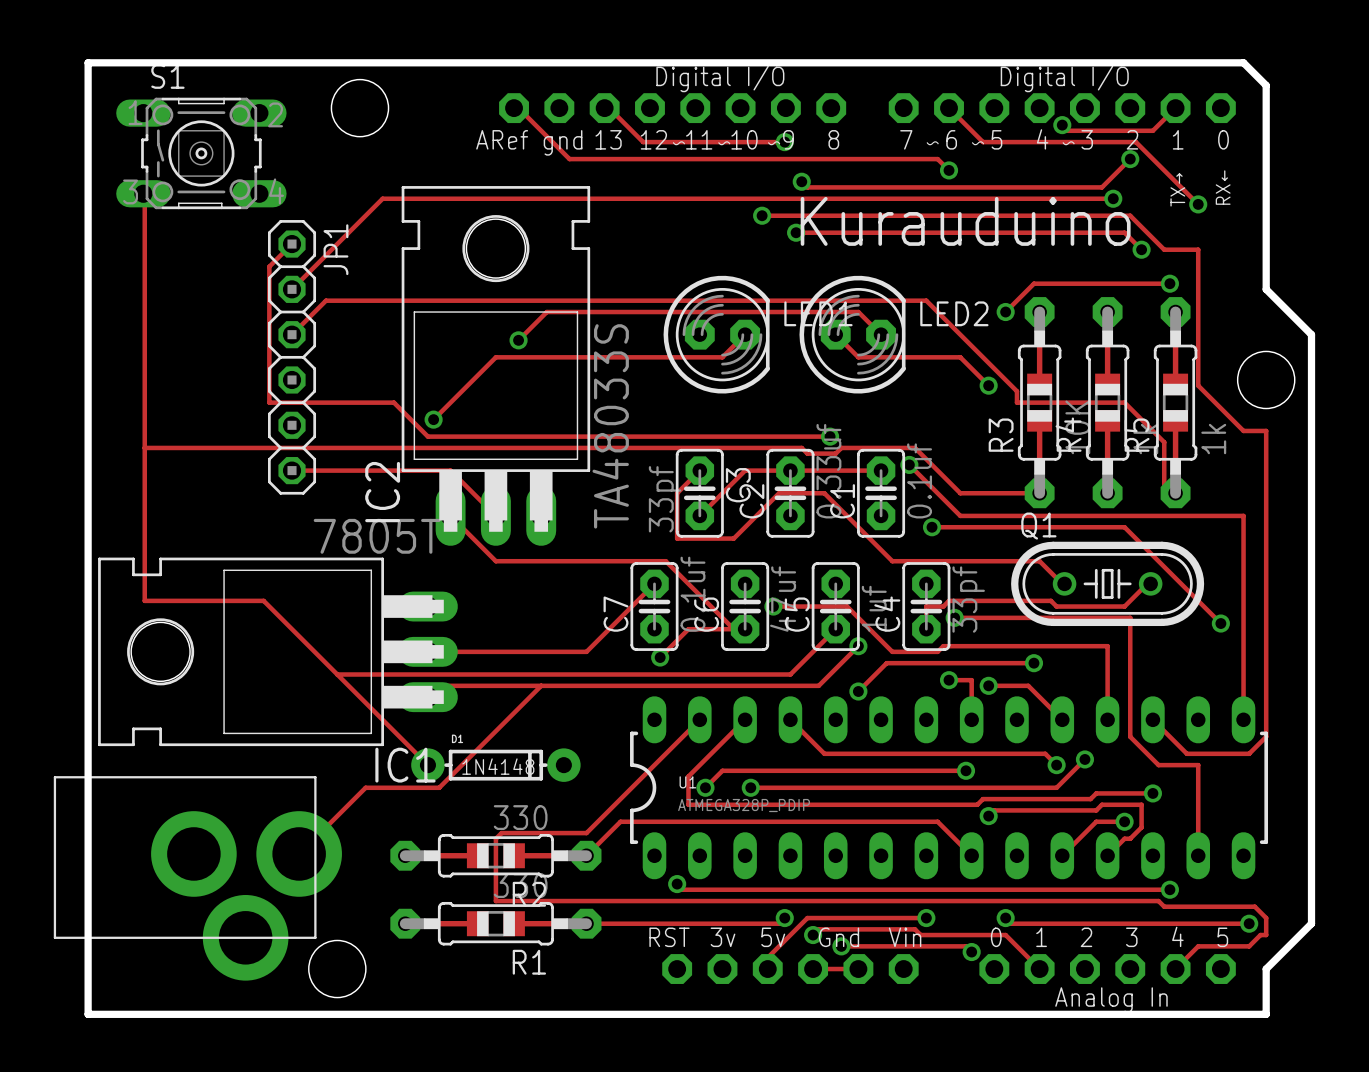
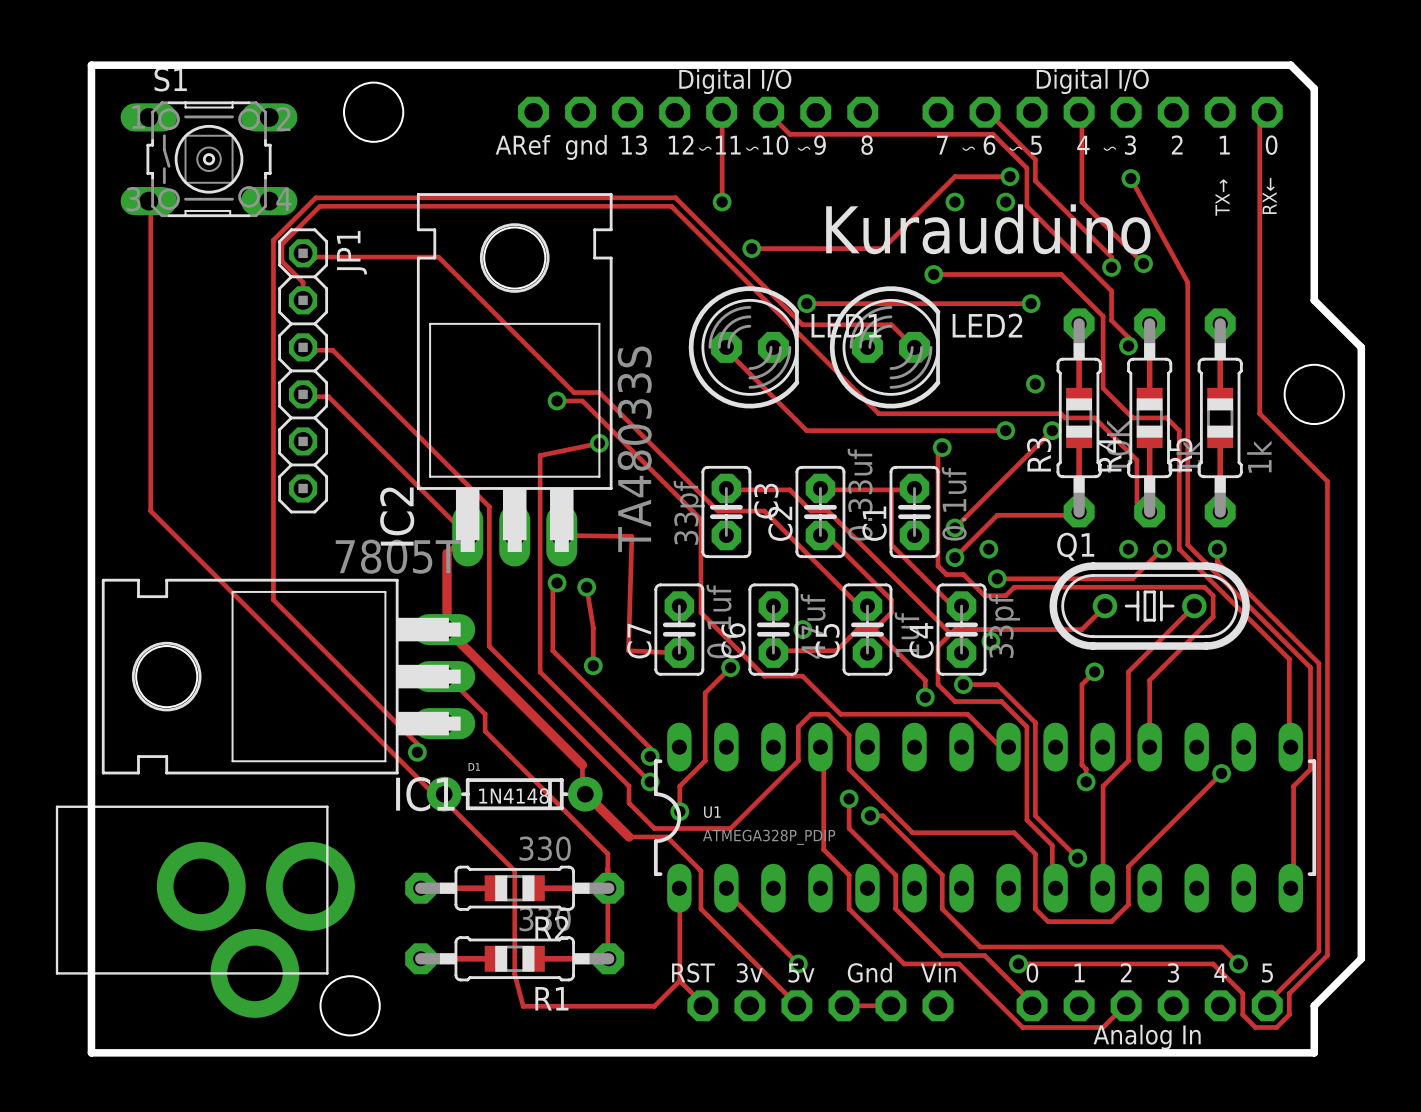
track: (514, 108) (518, 108) (569, 159) (937, 159) (949, 170) -> none
track: (604, 108) (609, 108) (643, 142) (784, 142) -> none
track: none -> (721, 112) (722, 202)
track: none -> (768, 112) (789, 134) (993, 134) (1026, 168) (1026, 206) (1111, 290) (1111, 320) (1128, 337) (1128, 345)
track: (949, 108) (983, 142) (1135, 142) (1198, 204) -> (985, 112) (988, 113) (1035, 159) (1035, 180) (1111, 257) (1111, 267)
track: none -> (1079, 112) (1081, 113) (1081, 202) (1143, 263)
track: (1175, 108) (1152, 130) (1067, 130) (1062, 125) -> none
track: none -> (1267, 112) (1259, 117) (1259, 413) (1327, 481) (1327, 955) (1289, 993) (1289, 1014) (1276, 1027) (1255, 1027) (1242, 1014) (1242, 993) (1213, 963) (1018, 963)
via: (1062, 125) -> none
via: (784, 142) -> none
track: (1130, 159) (1101, 187) (807, 187) (801, 181) -> none
via: (1130, 159) -> none
via: (949, 170) -> none
track: none -> (1009, 176) (954, 176) (883, 248) (751, 248)
via: none -> (1009, 176)
track: none -> (1130, 178) (1187, 282) (1187, 544) (1310, 667) (1310, 769) (1293, 786) (1293, 887) (1290, 888)
via: none -> (1130, 178)
via: (801, 181) -> none
track: (143, 193) (144, 600) (263, 600) (427, 765) -> (148, 201) (150, 202) (150, 511) (430, 790) (442, 790) (444, 794) (447, 794) (447, 803) (514, 870)
via: none -> (722, 202)
via: none -> (954, 202)
via: none -> (1005, 202)
track: (382, 198) (292, 289) -> (397, 206) (320, 206) (281, 244) (281, 261) (303, 282) (303, 300)
track: (646, 198) (1113, 198) -> (671, 206) (878, 413) (1060, 413) (1065, 417)
via: (1113, 198) -> none
via: (1198, 204) -> none
track: (762, 215) (1130, 215) (1164, 249) (1198, 249) (1198, 385) (1243, 430) (1266, 430) (1266, 736) (1249, 753) (1186, 753) (1152, 719) -> none
via: (762, 215) -> none
track: (796, 232) (1124, 232) (1141, 249) -> none
via: (796, 232) -> none
via: none -> (751, 248)
track: (292, 244) (269, 266) (269, 402) (393, 402) (427, 436) (830, 436) -> (303, 253) (303, 257) (438, 257) (574, 392) (599, 392) (717, 511) (764, 511) (857, 604) (866, 604) (867, 606)
via: (1141, 249) -> none
via: none -> (1143, 263)
via: none -> (1111, 267)
track: none -> (933, 274) (1061, 274) (1103, 316) (1103, 388) (1132, 417)
via: none -> (933, 274)
track: (1169, 283) (1033, 283) (1005, 312) -> none
via: (1169, 283) -> none
track: none -> (806, 303) (1031, 303)
via: none -> (806, 303)
via position: (1005, 312) -> (1031, 303)
via: none -> (1128, 345)
track: (292, 334) (325, 300) (926, 300) (1016, 391) (1016, 402) (1026, 402) -> (303, 347) (303, 350) (332, 350) (489, 506) (489, 646) (629, 786) (629, 803) (654, 828) (730, 828) (798, 760) (798, 726) (811, 714) (827, 714) (849, 735) (849, 769) (912, 832) (1014, 832) (1035, 853) (1035, 908) (1048, 921) (1111, 921) (1128, 904) (1128, 866) (1221, 773)
track: none -> (726, 347) (726, 350) (806, 430) (1005, 430)
track: (745, 334) (722, 357) (495, 357) (433, 419) -> none
track: (835, 334) (858, 357) (960, 357) (988, 385) -> none
track: (881, 334) (858, 312) (546, 312) (518, 340) -> (914, 347) (891, 324) (802, 324) (675, 197) (315, 197) (273, 240) (273, 599) (417, 743) (417, 752)
via position: (518, 340) -> (557, 401)
via: none -> (1035, 384)
track: none -> (303, 394) (303, 396) (328, 396) (467, 535) (463, 536) (447, 553) (447, 629)
via: (988, 385) -> none
track: (1054, 402) (1091, 402) -> (1094, 417) (1136, 460) (1136, 502) (1149, 515) (1149, 511)
track: (1123, 402) (1164, 442) (1164, 493) (1175, 493) -> none
via: none -> (1005, 430)
track: none -> (1052, 430) (954, 527)
via: none -> (1052, 430)
via: (433, 419) -> none
track: none -> (599, 443) (540, 455) (540, 671) (650, 781)
via: none -> (599, 443)
via: none -> (942, 447)
via: (830, 436) -> none
track: (144, 447) (801, 447) (807, 453) (835, 453) (841, 447) (915, 447) (960, 493) (1039, 493) -> (954, 557) (997, 515) (1077, 515) (1079, 511)
track: (909, 464) (960, 515) (1243, 515) (1243, 719) -> (1166, 417) (1179, 430) (1179, 549) (1289, 659) (1290, 747)
via: (909, 464) -> none
track: (292, 470) (450, 470) (495, 515) -> none
track: (699, 470) (677, 493) (677, 538) (733, 538) (779, 493) (824, 493) (892, 561) (1039, 561) (1062, 583) (1064, 583) -> (726, 488) (789, 489) (811, 511) (827, 511) (950, 633)
track: (881, 470) (745, 470) (699, 515) -> (914, 488) (820, 488)
track: none -> (891, 489) (891, 544) (950, 604) (961, 606)
via: none -> (954, 527)
track: (450, 515) (495, 561) (665, 561) (733, 629) -> none
track: none -> (561, 535) (631, 536) (628, 650) (679, 653)
track: none -> (820, 535) (823, 532) (891, 599) (891, 612) (874, 629) (925, 680) (925, 697)
track: (932, 527) (1124, 527) (1220, 623) -> none
via position: (932, 527) -> (954, 557)
via: none -> (988, 549)
via: none -> (1128, 549)
track: none -> (1162, 549) (1132, 578) (997, 578)
via: none -> (1162, 549)
track: none -> (1217, 549) (1217, 561) (1318, 663) (1318, 951) (1268, 1002) (1267, 1005)
via: none -> (1217, 549)
via: none -> (997, 578)
track: none -> (557, 583) (552, 587) (552, 650) (650, 748) (650, 756)
via: none -> (557, 583)
track: none -> (586, 587) (593, 627) (593, 665)
via: none -> (586, 587)
track: (654, 583) (586, 651) (427, 651) -> (608, 958) (607, 853) (485, 731) (485, 714) (447, 676) (444, 676)
track: (1150, 583) (1147, 583) (1124, 606) (1056, 606) (1050, 600) (949, 600) (943, 606) -> (1104, 606) (1081, 629) (979, 629)
track: (773, 606) (826, 606) -> (773, 653) (777, 650) (836, 650) (857, 629)
track: (842, 606) (847, 606) (892, 651) (937, 651) (943, 646) (1107, 646) (1107, 655) -> (942, 447) (938, 451) (938, 566) (946, 574) (963, 574) (984, 595) (1005, 595) (1014, 587) (1204, 587) (1213, 595) (1213, 616) (1149, 680)
track: none -> (961, 629) (954, 629) (938, 646) (938, 684) (954, 701) (1001, 701) (1026, 726) (1026, 820) (1052, 845) (1052, 887) (1055, 888)
track: (954, 617) (1130, 617) (1130, 736) (1158, 765) (1198, 765) (1198, 855) -> none
via: (1220, 623) -> none
track: (745, 629) (688, 629) (660, 657) -> none
track: (835, 629) (790, 674) (337, 674) -> none
via: none -> (593, 665)
track: none -> (730, 667) (705, 693) (705, 760) (679, 786) (679, 811)
via: none -> (730, 667)
track: (858, 646) (818, 685) (439, 685) (427, 697) -> none
via: (858, 646) -> none
track: none -> (1094, 671) (1081, 684) (1081, 765) (1086, 769) (1086, 781)
via: (660, 657) -> none
track: none -> (963, 684) (997, 684) (1035, 722) (1035, 815) (1077, 858)
via: none -> (963, 684)
track: (1033, 663) (886, 663) (858, 691) -> none
via position: (1033, 663) -> (1094, 671)
via: none -> (925, 697)
track: (949, 680) (971, 680) (971, 719) -> (557, 401) (582, 401) (700, 519) (700, 612) (764, 676) (802, 676) (840, 714) (967, 714) (997, 743) (1005, 743) (1008, 747)
via: (949, 680) -> none
track: (541, 685) (439, 787) (365, 787) (299, 853) -> none
track: (988, 685) (1028, 685) (1062, 719) -> none
via: (988, 685) -> none
via: (858, 691) -> none
track: (699, 719) (586, 833) (501, 833) (495, 838) -> none
track: (745, 719) (688, 776) (688, 804) (977, 804) (983, 799) (1090, 799) (1096, 793) (1152, 793) -> none
track: (790, 719) (824, 753) (1045, 753) (1056, 765) -> (820, 747) (823, 748) (823, 849) (849, 875) (849, 908) (904, 963) (959, 963) (1022, 1027) (1103, 1027) (1126, 1005)
via: none -> (417, 752)
via: none -> (650, 756)
via: none -> (1221, 773)
via: none -> (650, 781)
track: (1084, 759) (1056, 787) (750, 787) -> none
via: (1084, 759) -> none
via position: (1056, 765) -> (1086, 781)
track: none -> (849, 798) (849, 828) (895, 875) (895, 908) (942, 955) (984, 955) (1031, 1002) (1032, 1005)
via: none -> (849, 798)
track: (966, 770) (722, 770) (705, 787) -> none
via: (966, 770) -> none
via: none -> (679, 811)
track: none -> (870, 815) (883, 815) (942, 875) (942, 908) (980, 947) (1221, 947) (1238, 963)
via: none -> (870, 815)
via: (705, 787) -> none
via: (750, 787) -> none
via: (1152, 793) -> none
track: (988, 816) (994, 810) (1096, 810) (1101, 804) (1141, 804) (1141, 827) (1130, 838) (1124, 838) (1107, 855) -> none
via: (988, 816) -> none
track: (1124, 821) (1096, 821) (1062, 855) -> (1194, 606) (1128, 671) (1128, 760) (1103, 786) (1103, 887)
via: (1124, 821) -> none
via: none -> (1077, 858)
track: (586, 855) (620, 821) (937, 821) (971, 855) -> none
track: none -> (679, 888) (679, 980)
track: none -> (726, 888) (726, 892) (798, 963)
track: (677, 884) (682, 889) (1169, 889) -> none
via: (677, 884) -> none
via: (1169, 889) -> none
track: (495, 901) (1158, 901) (1164, 906) (1254, 906) (1266, 918) (1266, 935) (1260, 935) (1249, 946) (1198, 946) (1175, 969) -> (514, 935) (514, 974) (523, 1006) (654, 1006) (679, 980)
track: (784, 918) (779, 923) (586, 923) -> none
via position: (784, 918) -> (798, 963)
track: (926, 918) (807, 918) (767, 957) (767, 969) -> (447, 629) (582, 765) (582, 790) (629, 836) (667, 836) (700, 870) (700, 908) (796, 1005)
via: (926, 918) -> none
track: (1005, 918) (1011, 923) (1249, 923) -> none
via: (1005, 918) -> none
via: (1249, 923) -> none
via: none -> (1018, 963)
via: none -> (1238, 963)
track: (813, 935) (818, 929) (915, 929) (920, 935) (1005, 935) (1039, 969) -> none
via: (813, 935) -> none
track: none -> (679, 980) (702, 1005)
track: (841, 946) (966, 946) (971, 952) -> none
via: (841, 946) -> none
via: (971, 952) -> none

